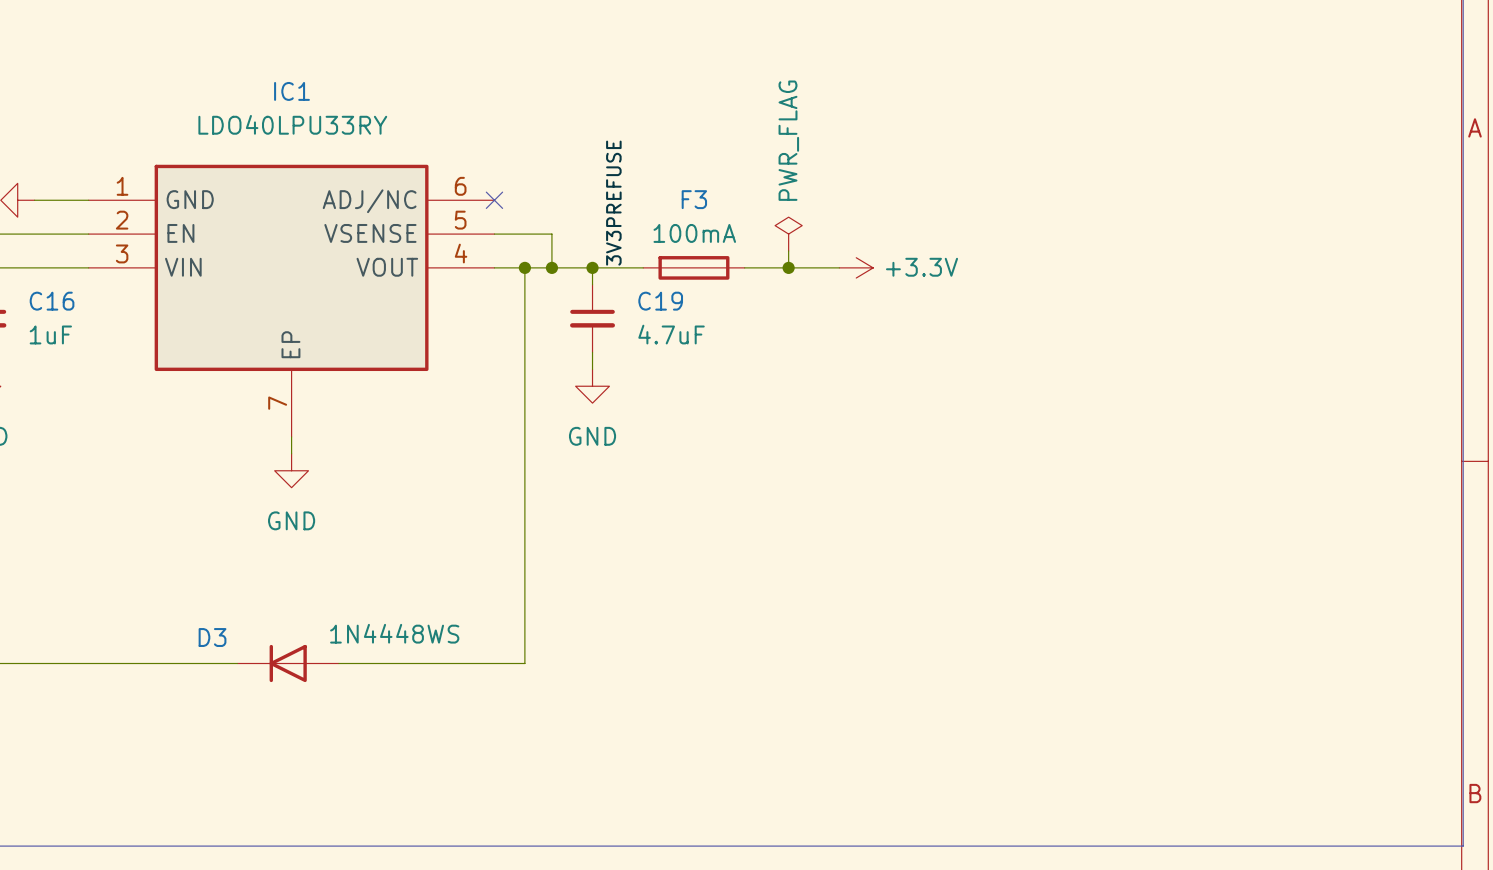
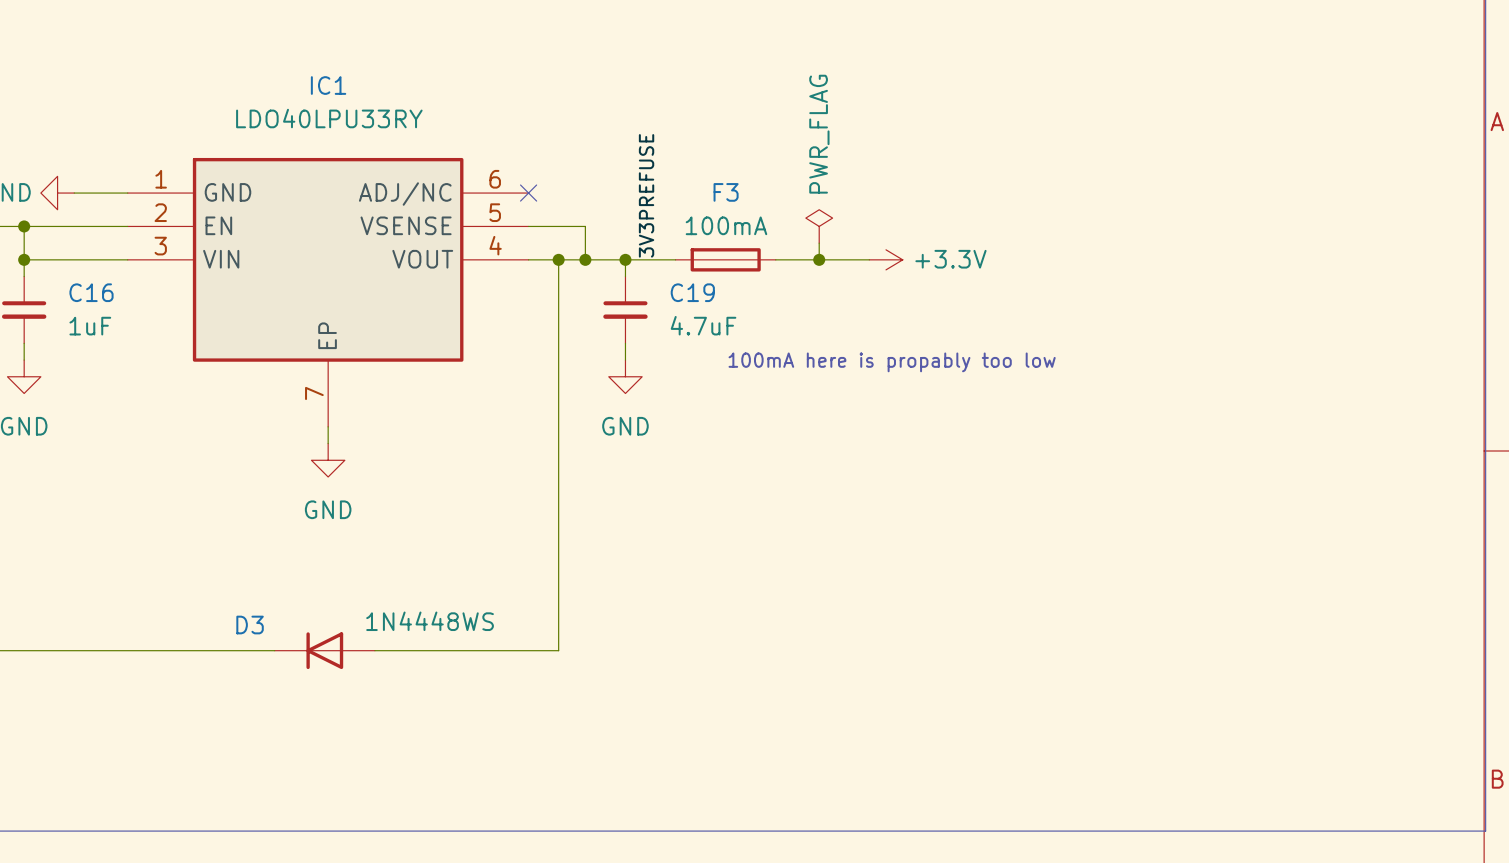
text: none -> 100mA here is propably too low (892, 362)

